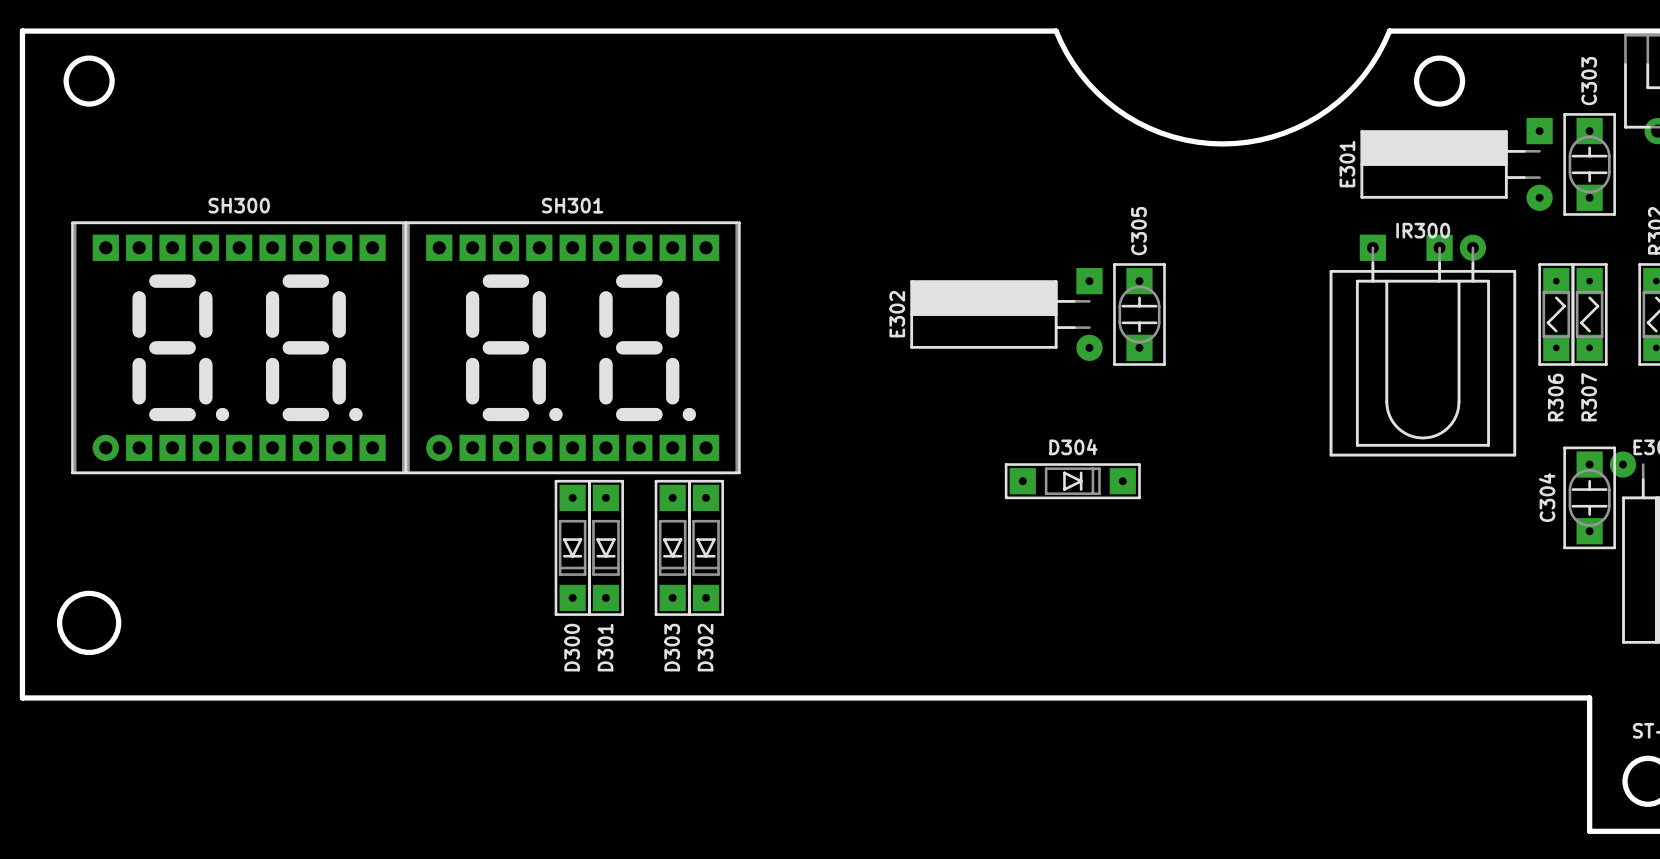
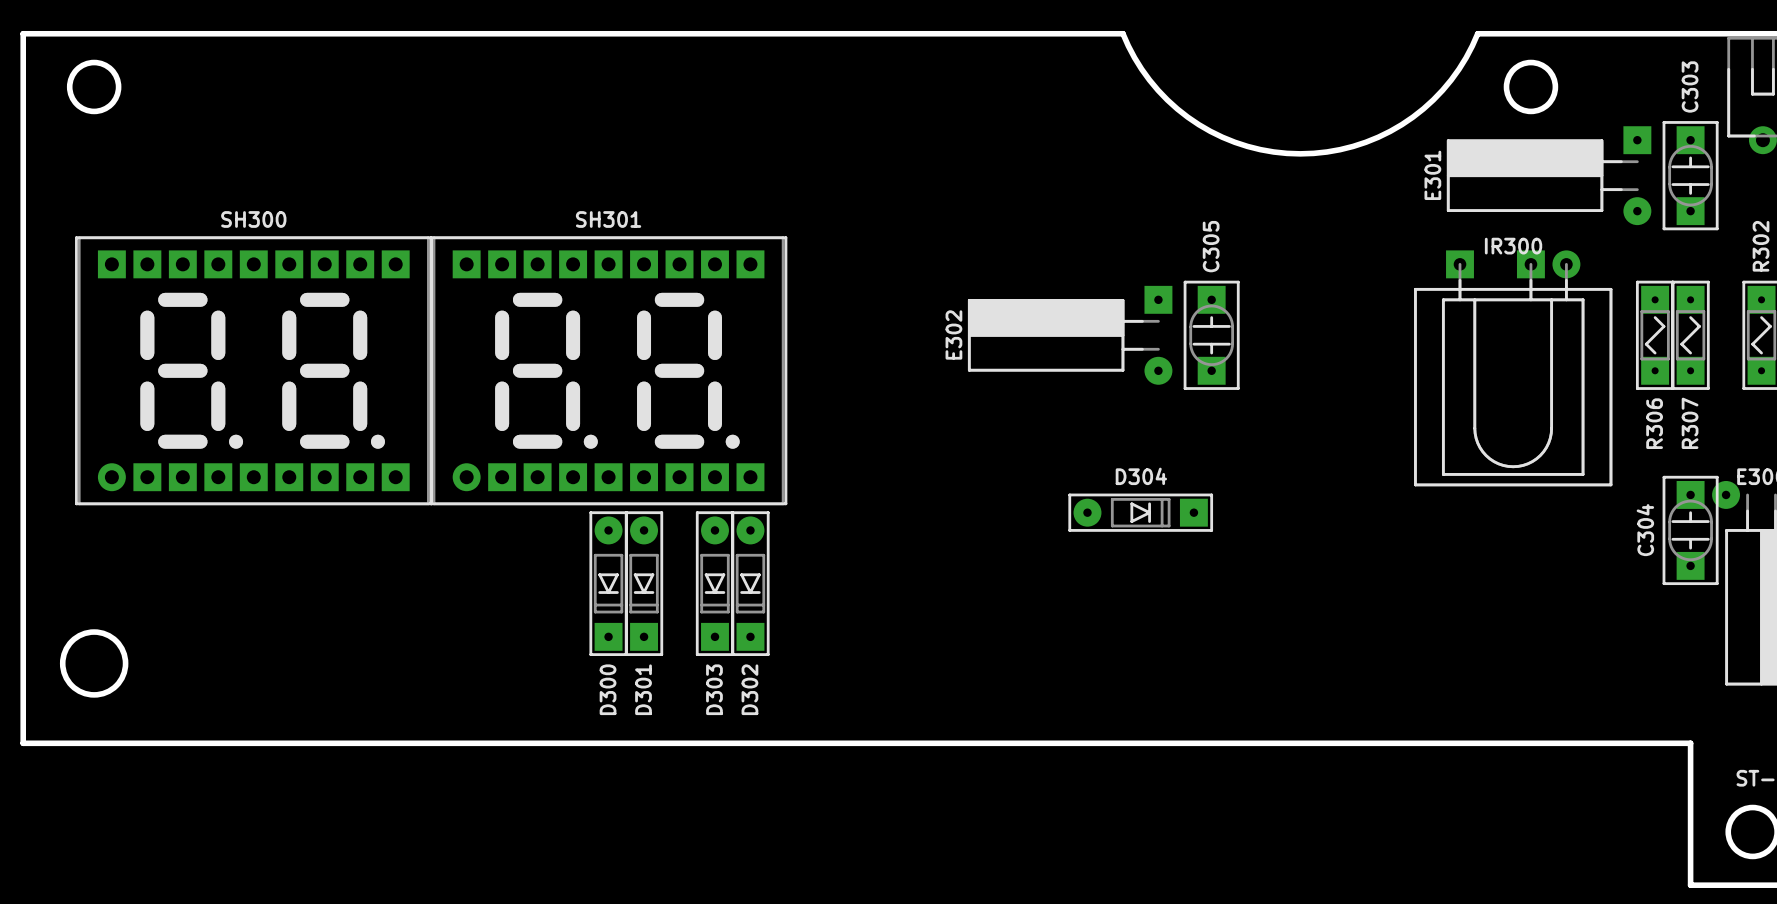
D304 footprint: [1004, 463, 1141, 500] -> [1068, 493, 1214, 532]
D300 footprint: [554, 479, 591, 616] -> [589, 511, 628, 656]
D301 footprint: [588, 479, 624, 616] -> [624, 511, 664, 656]
D303 footprint: [654, 479, 691, 616] -> [695, 511, 735, 656]
D302 footprint: [688, 479, 725, 616] -> [731, 511, 770, 656]

